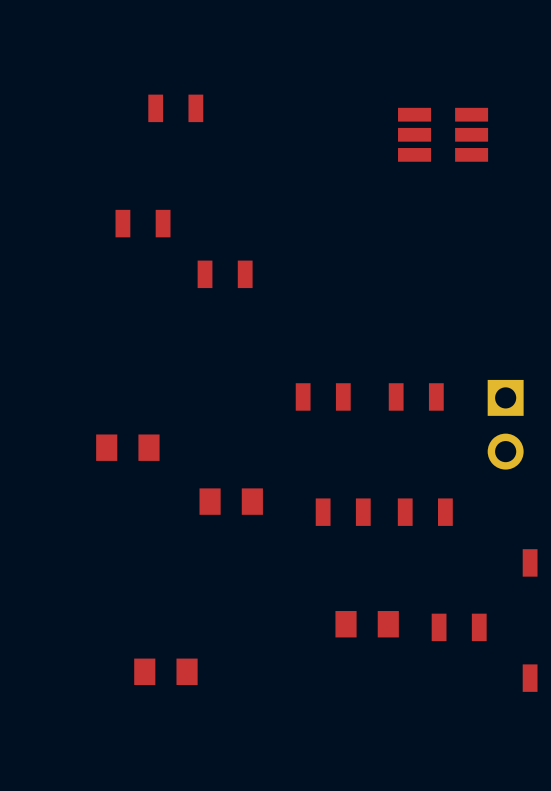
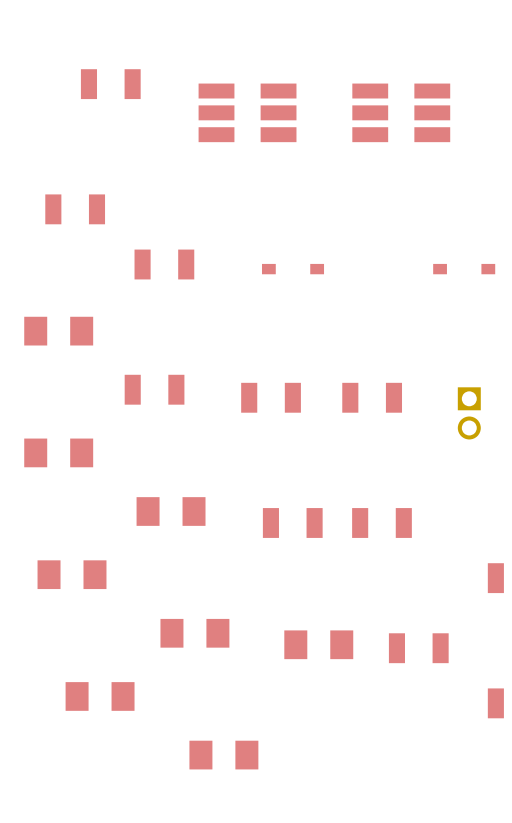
part: none -> (247, 112)
part: none -> (293, 269)
part: none -> (464, 269)
part: none -> (58, 331)
part footprint: [487, 379, 524, 470] -> [457, 387, 481, 440]
part: none -> (154, 389)
part: none -> (72, 574)
part: none -> (194, 633)
part: none -> (223, 755)

